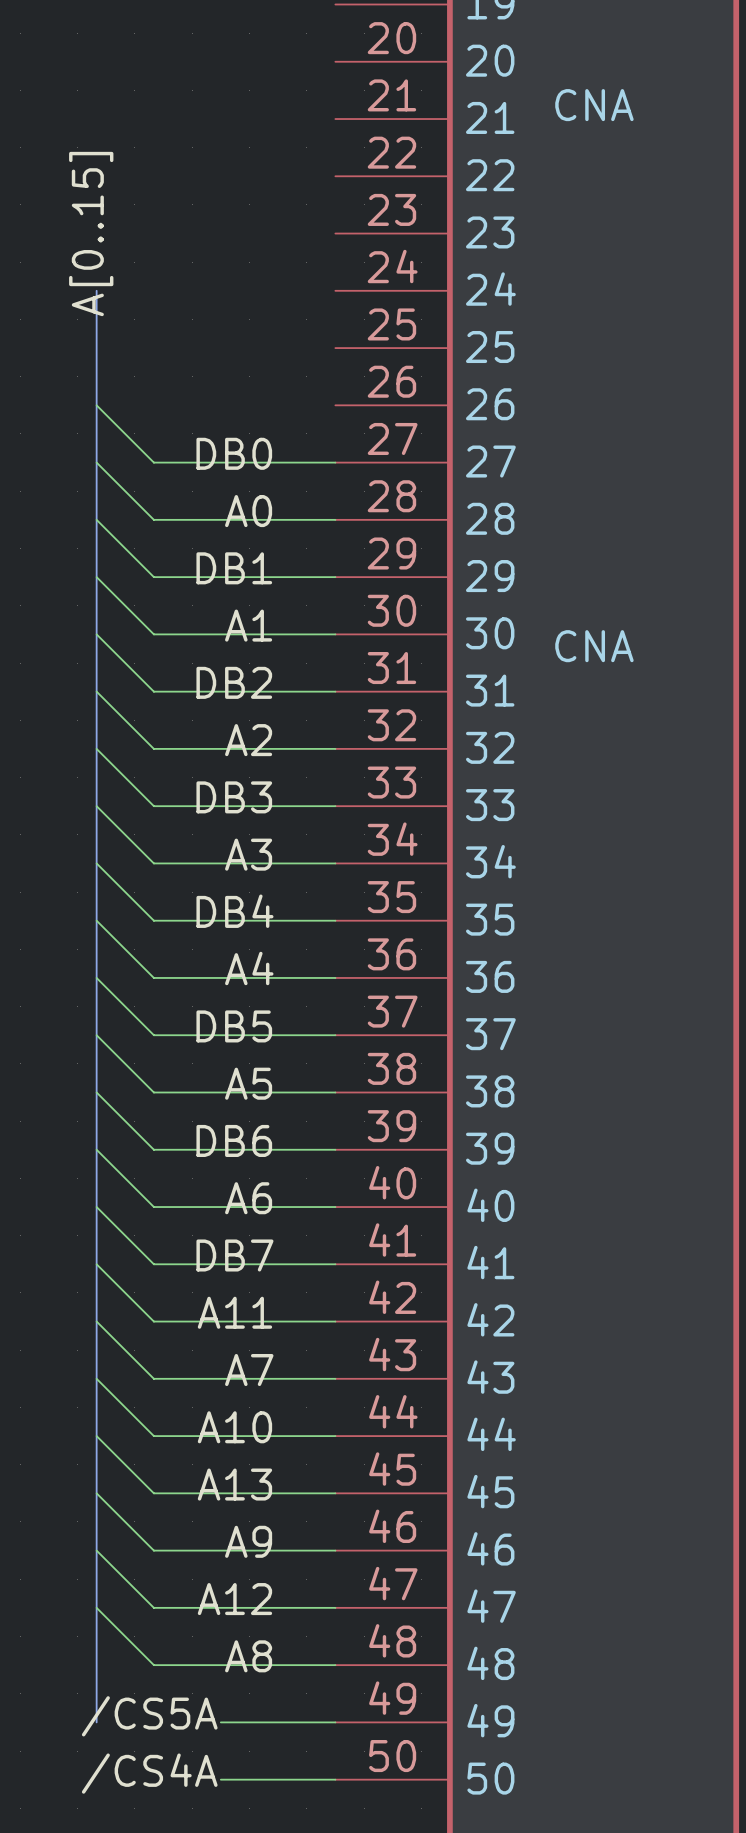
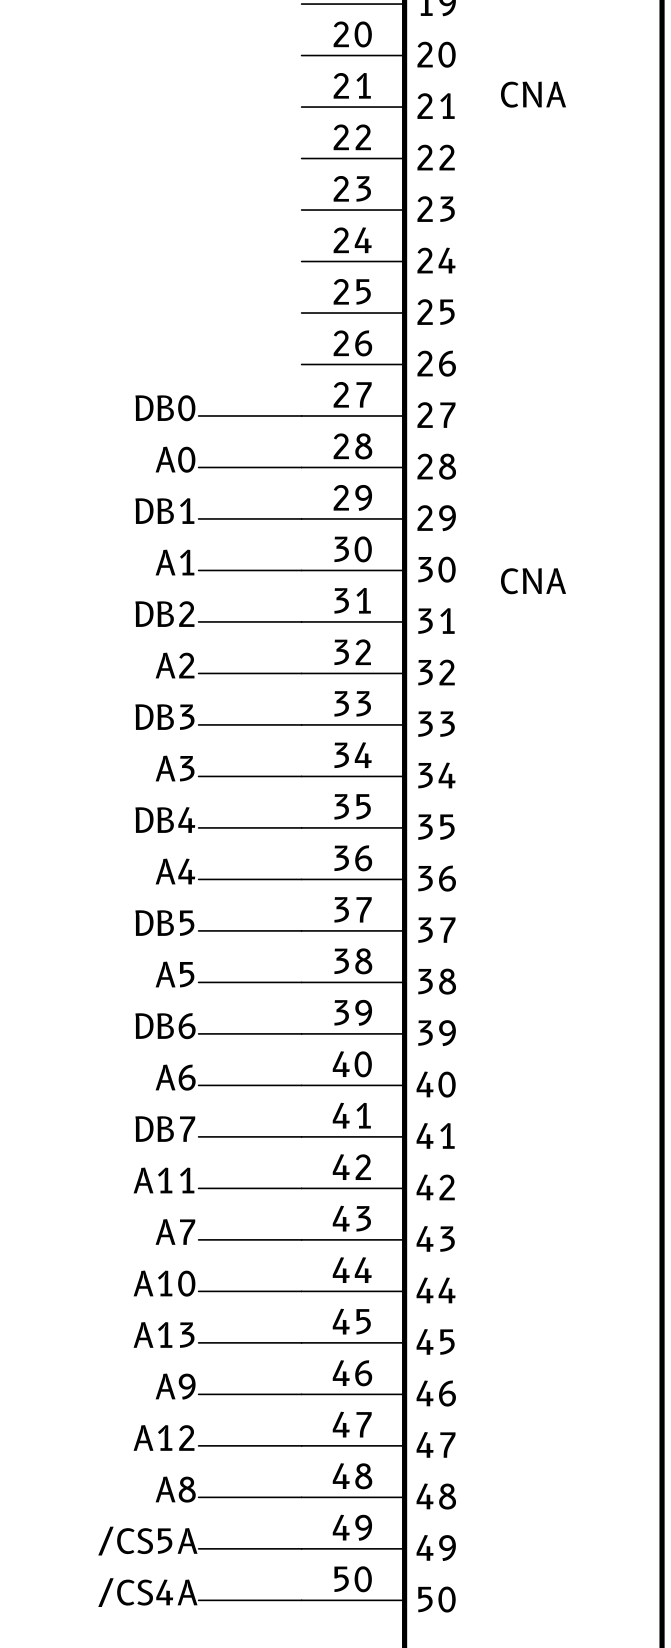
label: A[0..15] (91, 234) -> none
bus: (96, 290) (96, 1722) -> none
wire: (96, 405) (153, 462) (220, 462) -> none
label position: DB0 (234, 453) -> DB0 (165, 408)
wire: (96, 462) (153, 519) (220, 519) -> none
label position: A0 (248, 511) -> A0 (175, 459)
wire: (96, 519) (153, 577) (220, 577) -> none
label position: DB1 (234, 568) -> DB1 (164, 511)
wire: (96, 577) (153, 634) (220, 634) -> none
label position: A1 (248, 625) -> A1 (174, 562)
wire: (96, 634) (153, 691) (220, 691) -> none
label position: DB2 (234, 682) -> DB2 (164, 614)
wire: (96, 691) (153, 748) (220, 748) -> none
label position: A2 (248, 740) -> A2 (175, 665)
wire: (96, 748) (153, 806) (220, 806) -> none
label position: DB3 (234, 797) -> DB3 (164, 717)
wire: (96, 806) (153, 863) (220, 863) -> none
label position: A3 (248, 854) -> A3 (175, 768)
wire: (96, 863) (153, 920) (220, 920) -> none
label position: DB4 (234, 911) -> DB4 (165, 820)
wire: (96, 920) (153, 977) (220, 977) -> none
label position: A4 (249, 968) -> A4 (175, 871)
wire: (96, 977) (153, 1035) (220, 1035) -> none
label position: DB5 (234, 1026) -> DB5 (164, 923)
wire: (96, 1035) (153, 1092) (220, 1092) -> none
label position: A5 (248, 1083) -> A5 (174, 974)
wire: (96, 1092) (153, 1149) (220, 1149) -> none
label position: DB6 (234, 1140) -> DB6 (165, 1026)
wire: (96, 1149) (153, 1207) (220, 1207) -> none
label position: A6 (248, 1198) -> A6 (175, 1077)
wire: (96, 1207) (153, 1264) (220, 1264) -> none
label position: DB7 (234, 1255) -> DB7 (165, 1129)
wire: (96, 1264) (153, 1321) (220, 1321) -> none
label position: A11 (234, 1312) -> A11 (163, 1180)
wire: (96, 1321) (153, 1378) (220, 1378) -> none
label position: A7 (249, 1370) -> A7 (175, 1231)
wire: (96, 1378) (153, 1436) (220, 1436) -> none
label position: A10 (234, 1427) -> A10 (164, 1283)
wire: (96, 1436) (153, 1493) (220, 1493) -> none
label position: A13 (234, 1484) -> A13 (164, 1334)
wire: (96, 1493) (153, 1550) (220, 1550) -> none
label position: A9 (248, 1541) -> A9 (175, 1386)
wire: (96, 1550) (153, 1607) (220, 1607) -> none
label position: A12 (234, 1599) -> A12 (164, 1437)
wire: (96, 1607) (153, 1665) (220, 1665) -> none
label position: A8 (248, 1656) -> A8 (175, 1489)

